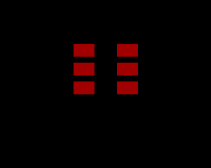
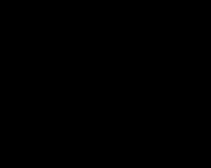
part: (105, 69) -> none

